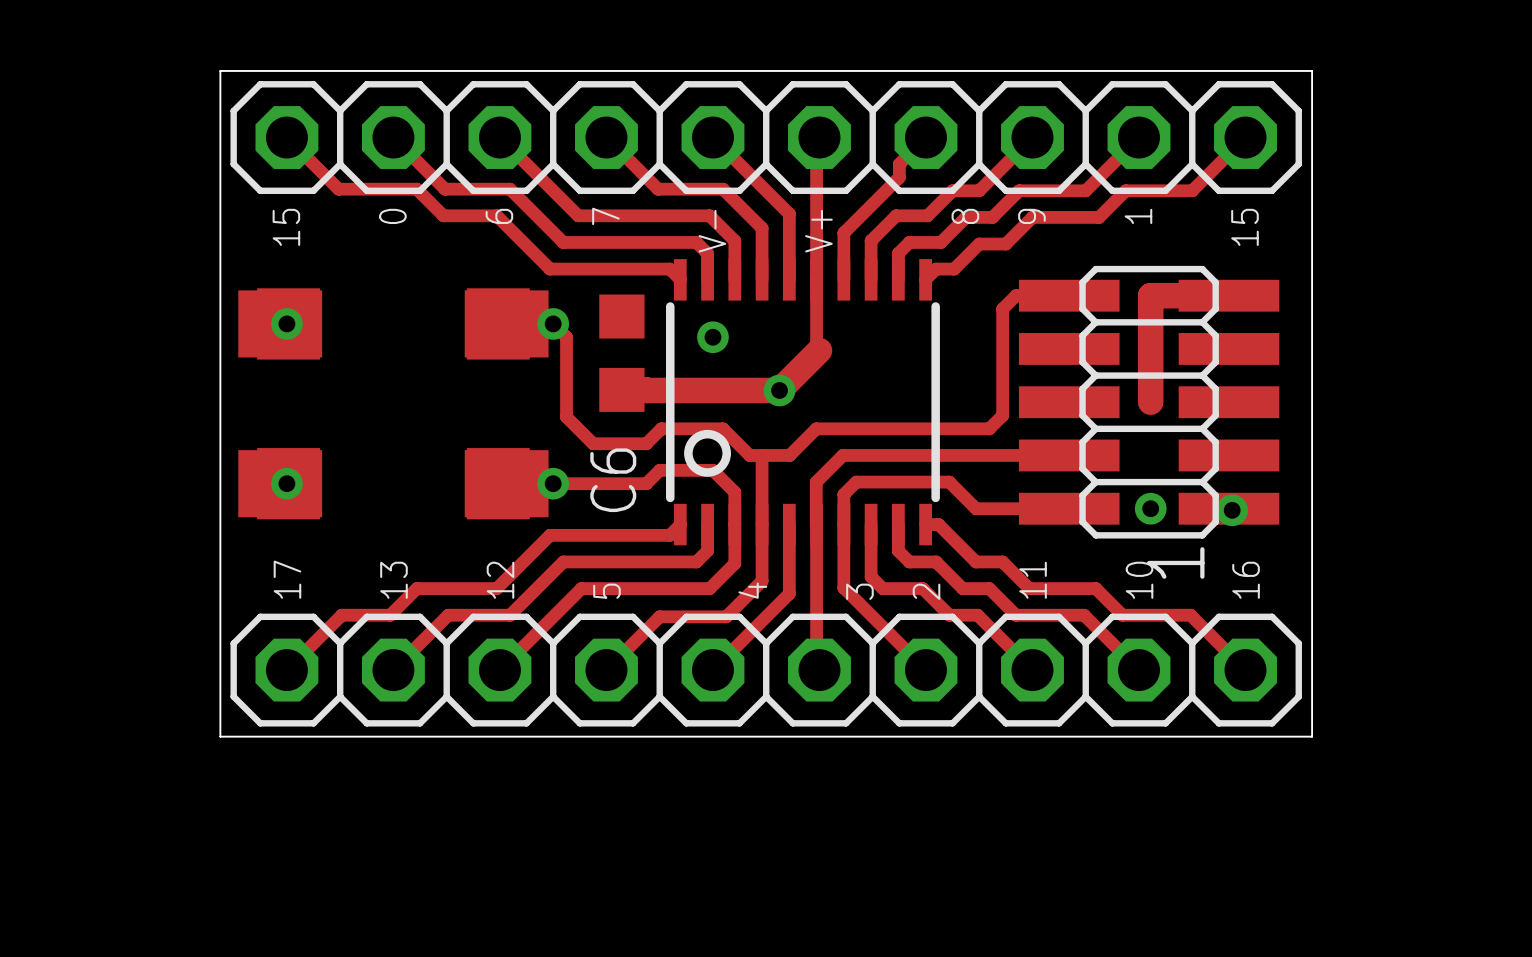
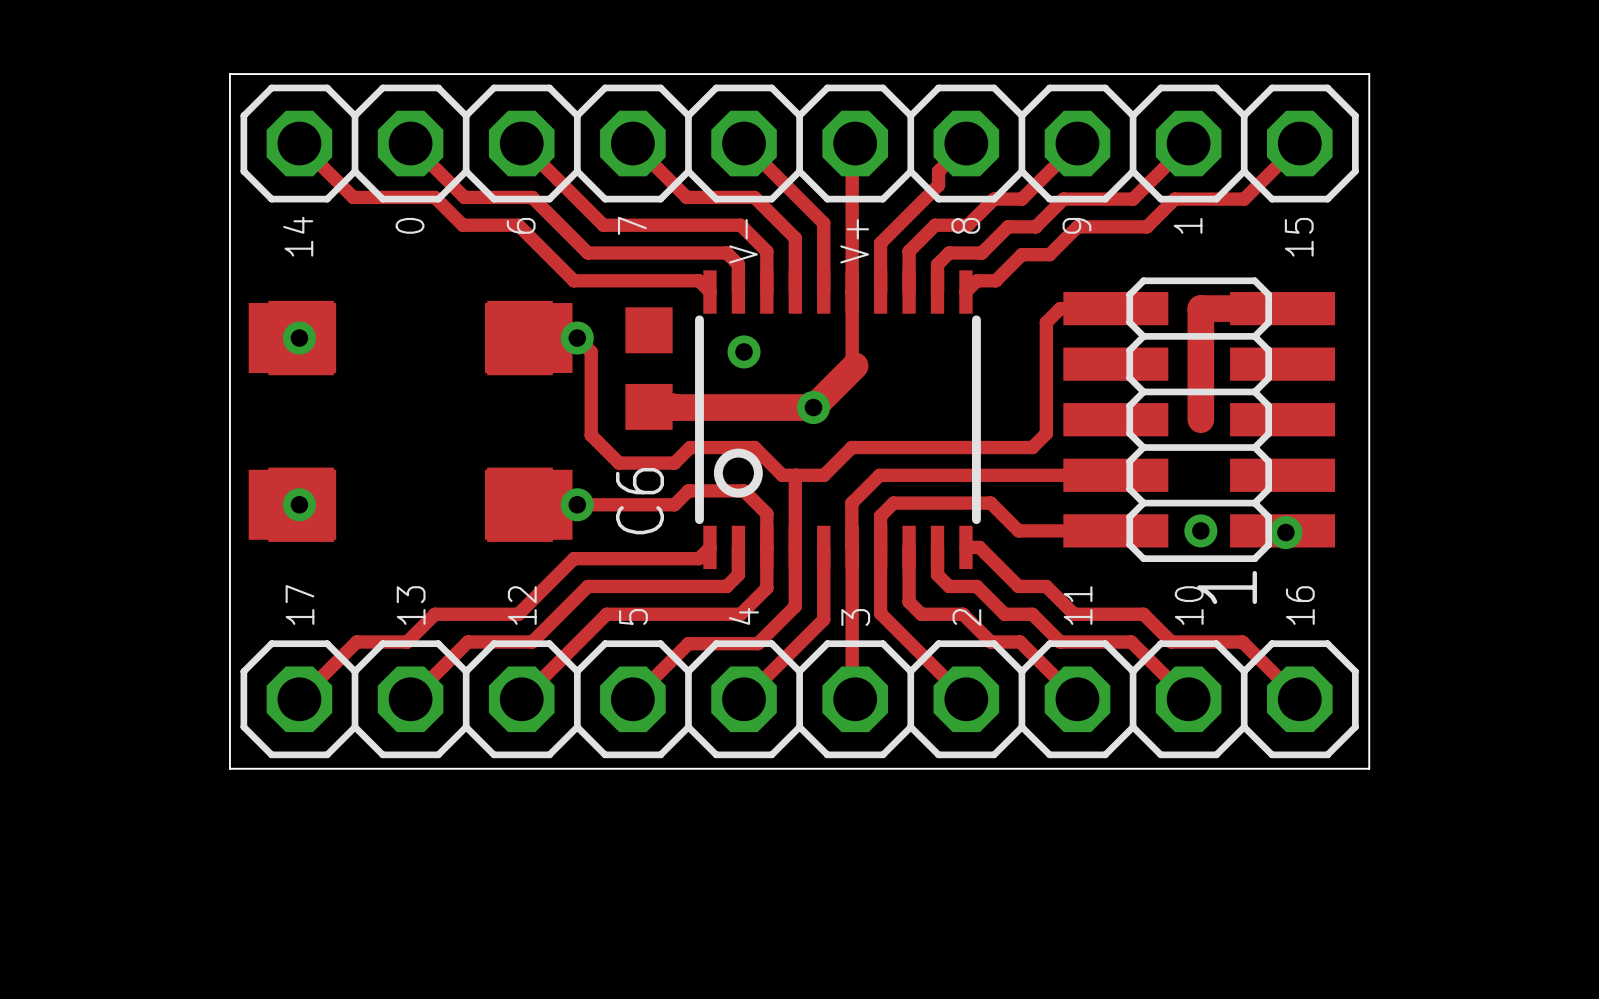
text position: 8 (965, 216) -> 8 (965, 225)
text: 15 (286, 227) -> 14 (298, 236)
text position: 4 (752, 590) -> 4 (743, 616)
text position: 3 (859, 591) -> 3 (855, 617)

